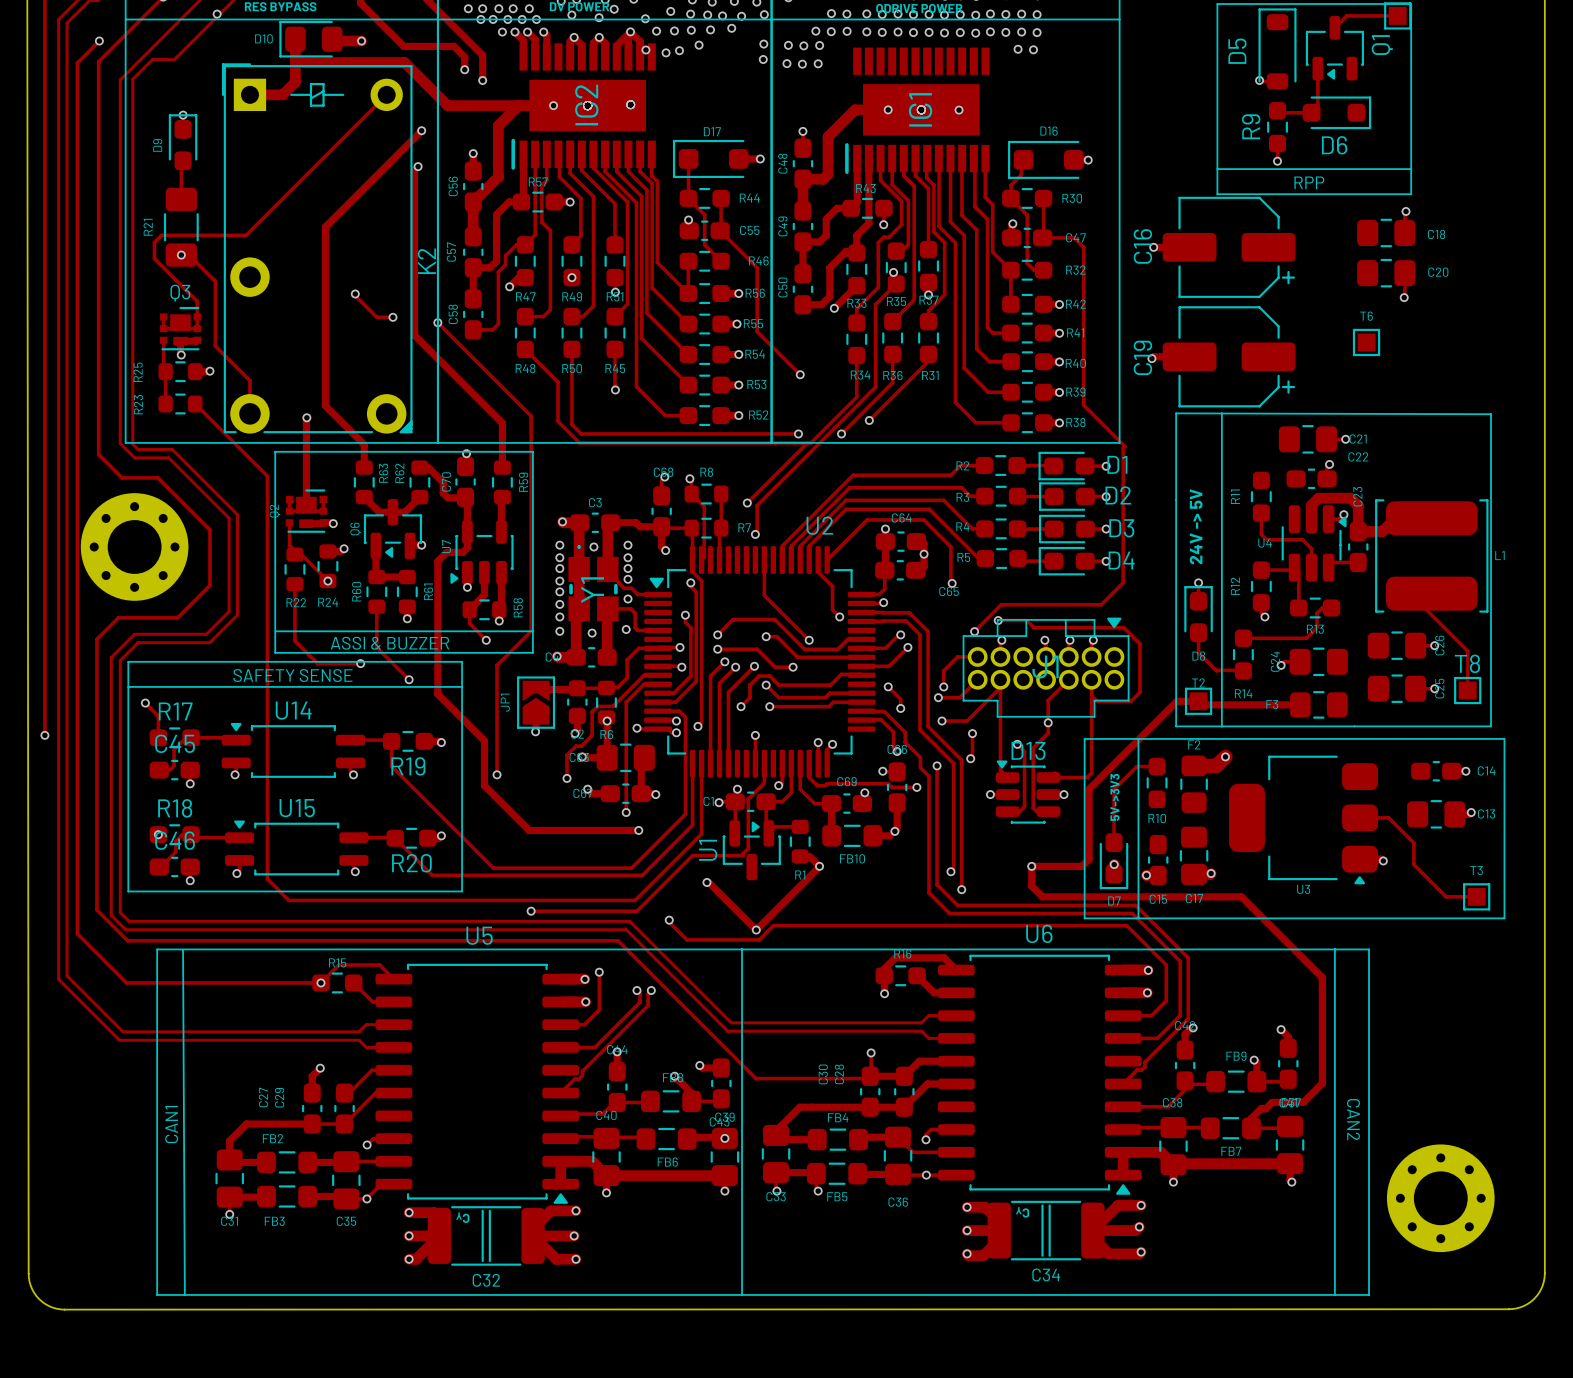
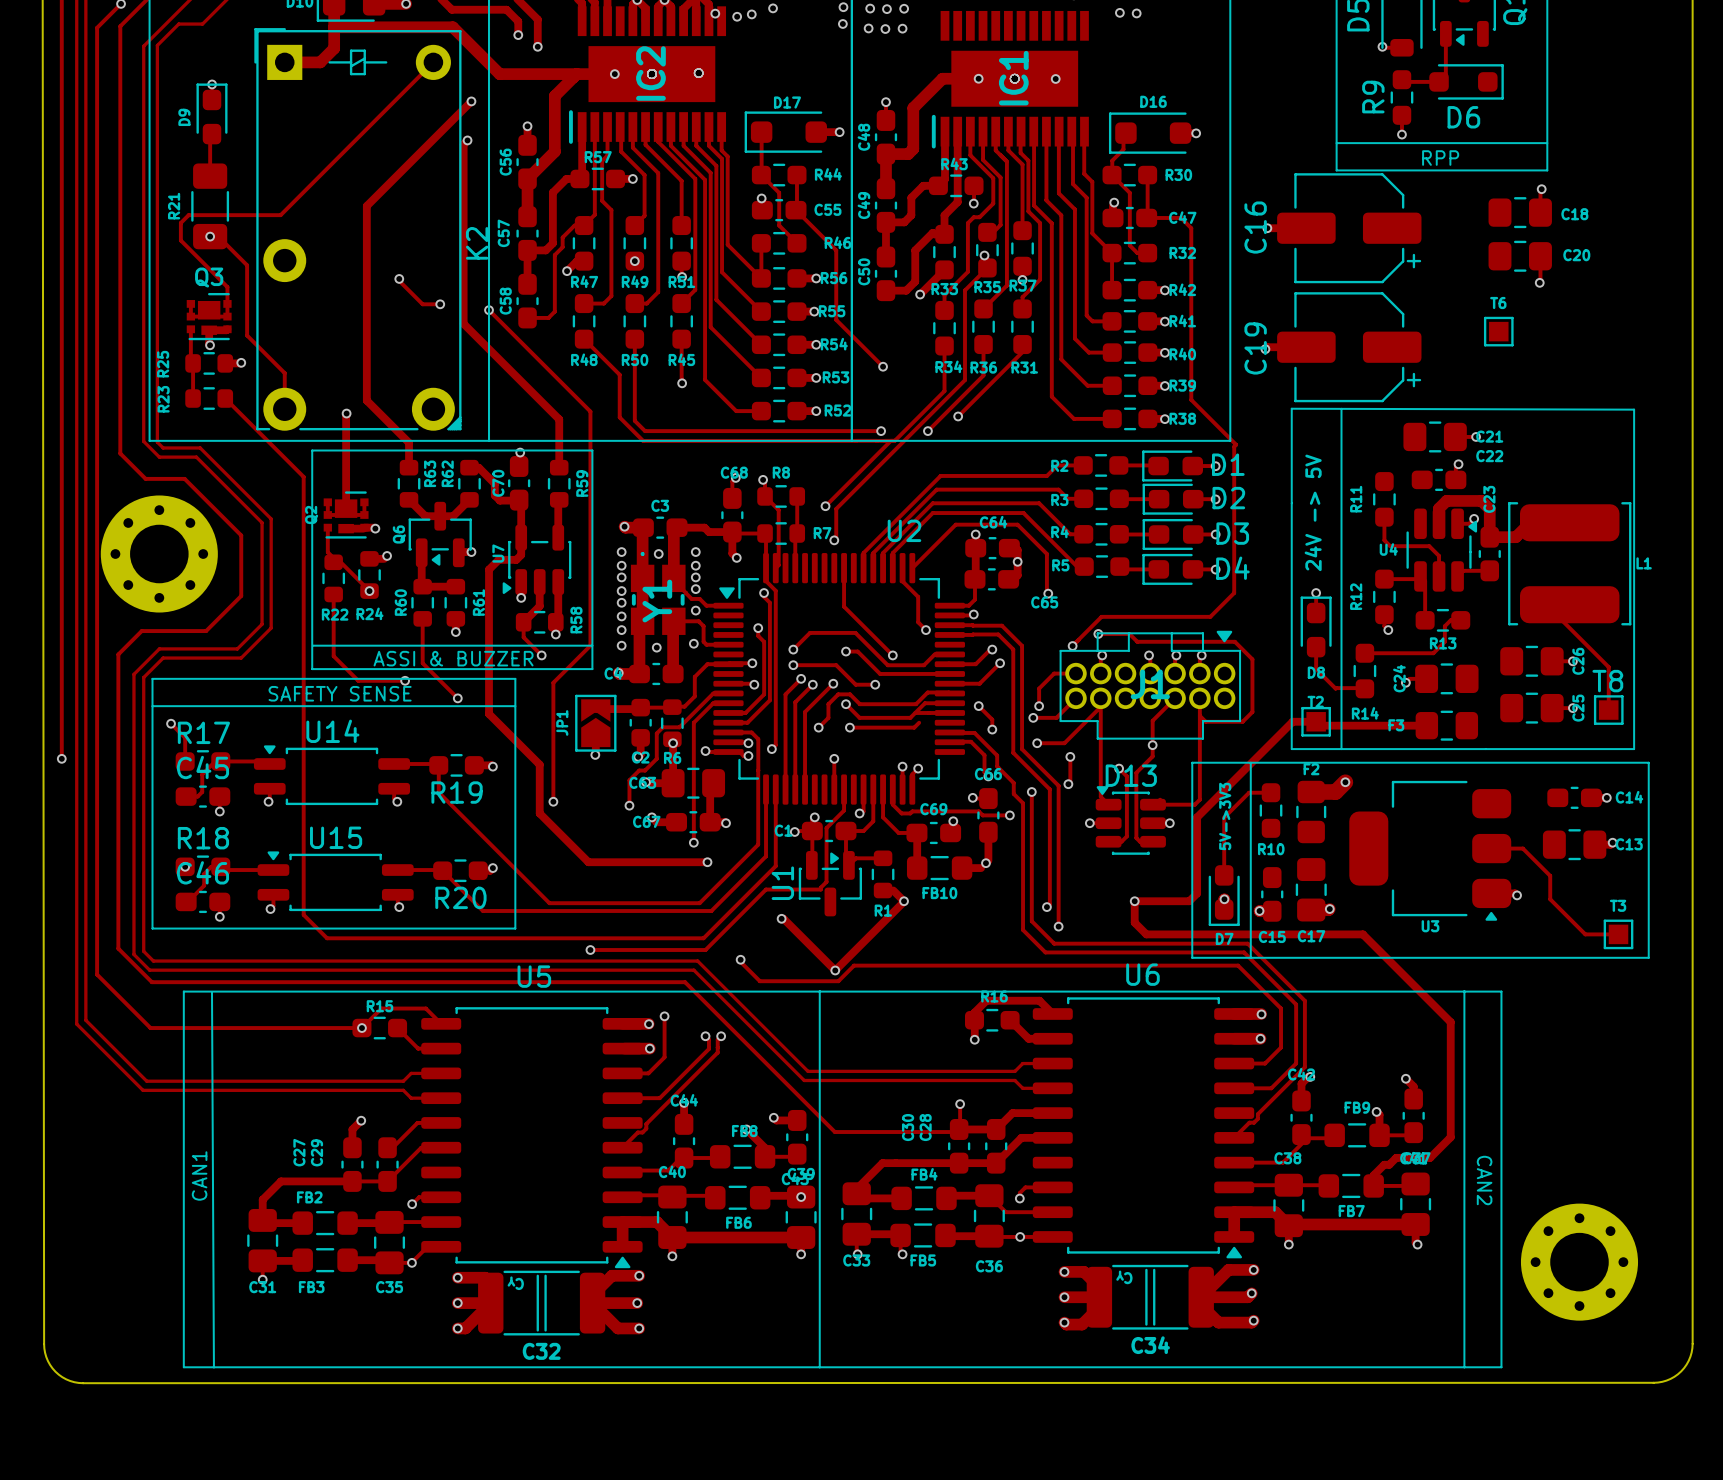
track: none -> (949, 703) (925, 703) (915, 712)
track: (833, 702) (861, 702) -> none

